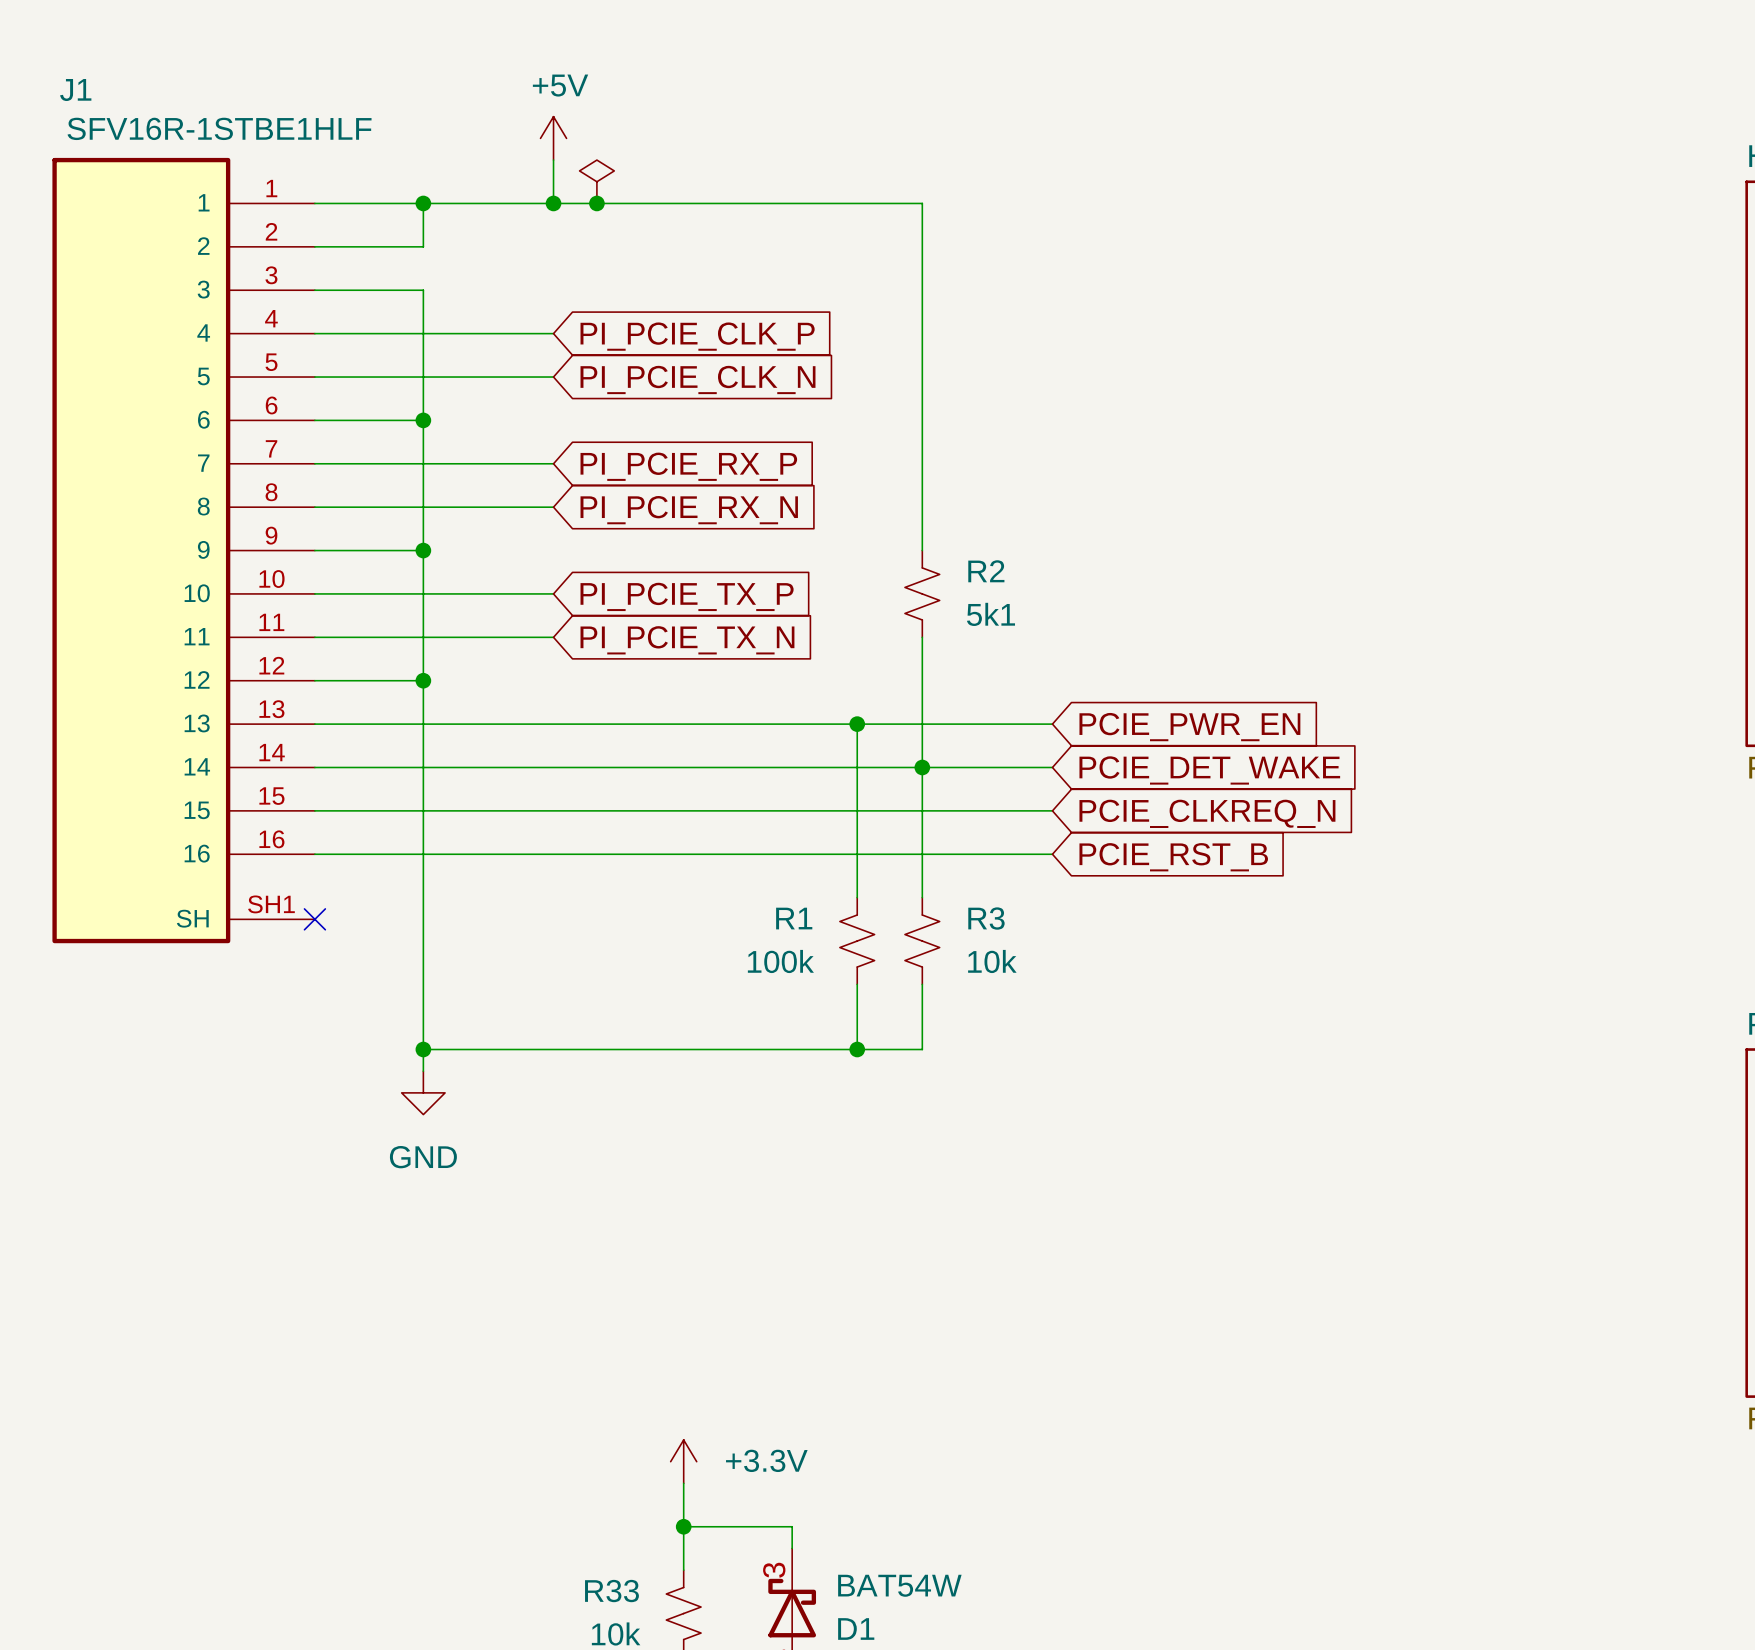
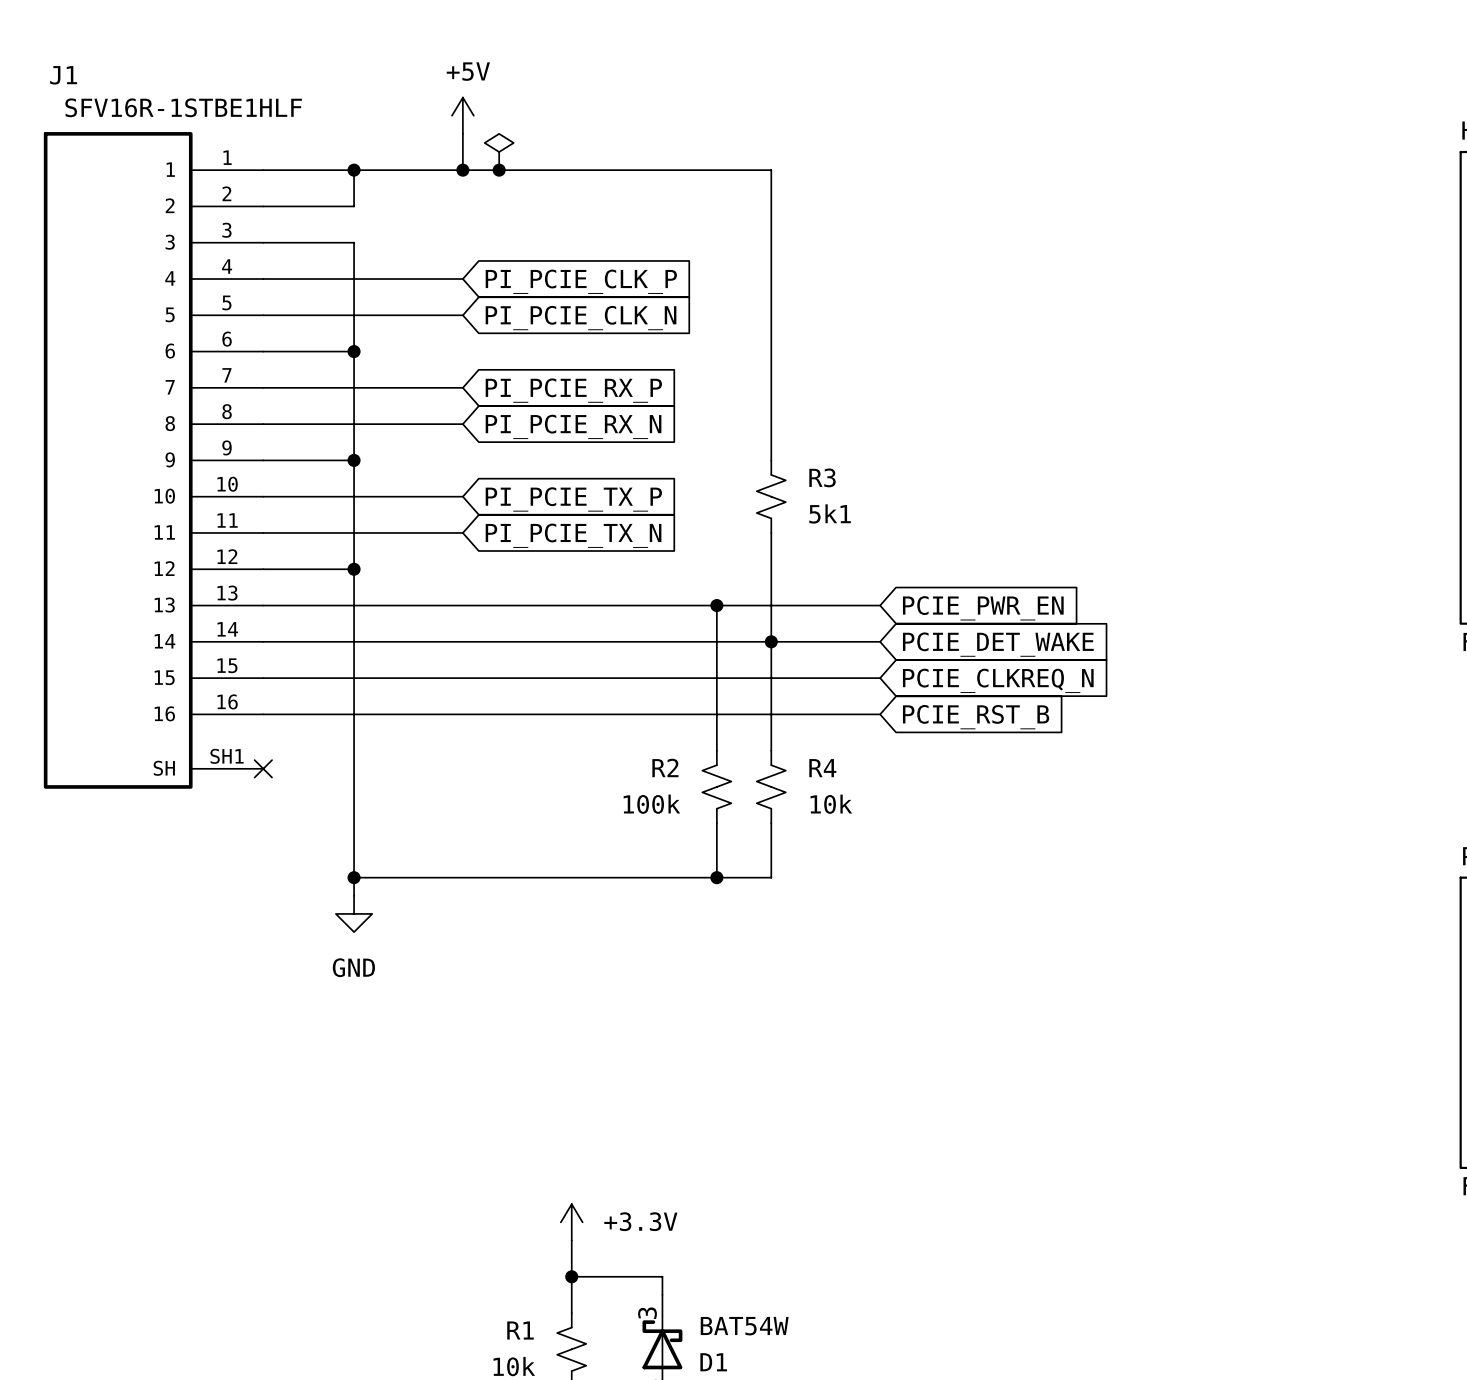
R2 name: R2 (986, 571) -> R3 (822, 477)
R1 name: R1 (794, 918) -> R2 (665, 767)
R3 name: R3 (986, 918) -> R4 (822, 768)
R33 name: R33 (611, 1591) -> R1 (520, 1330)

